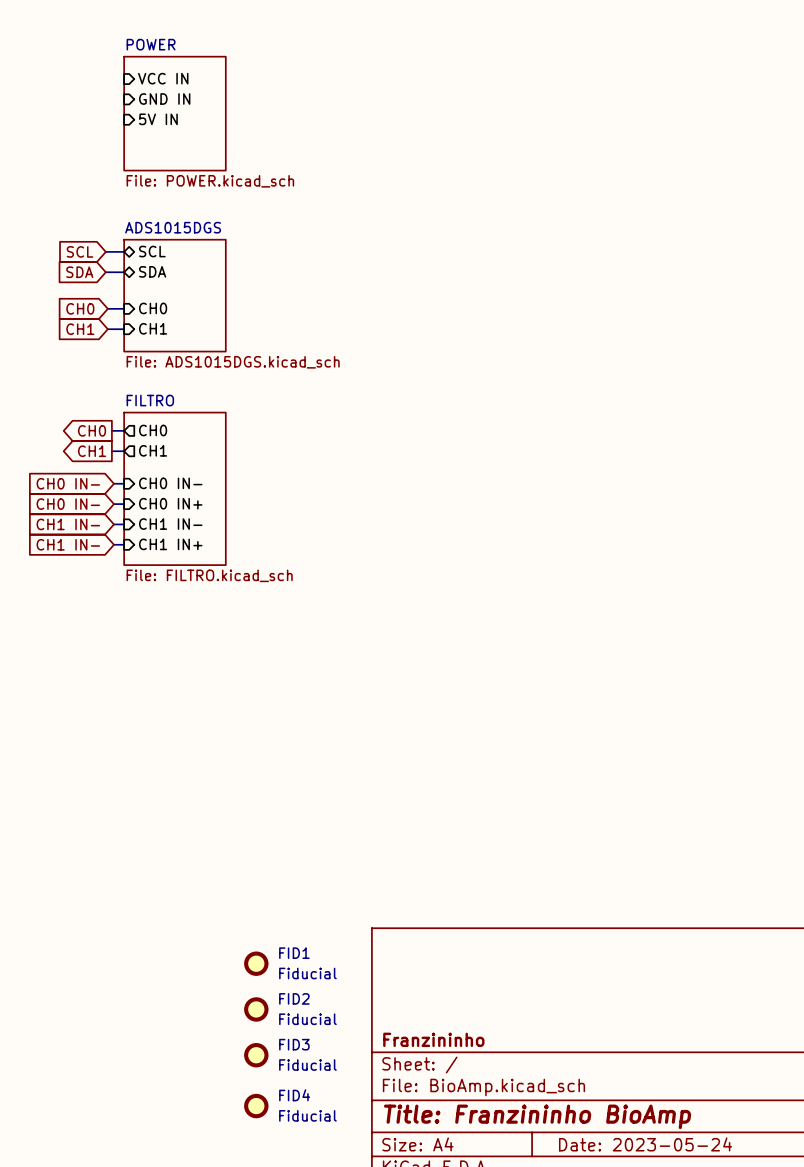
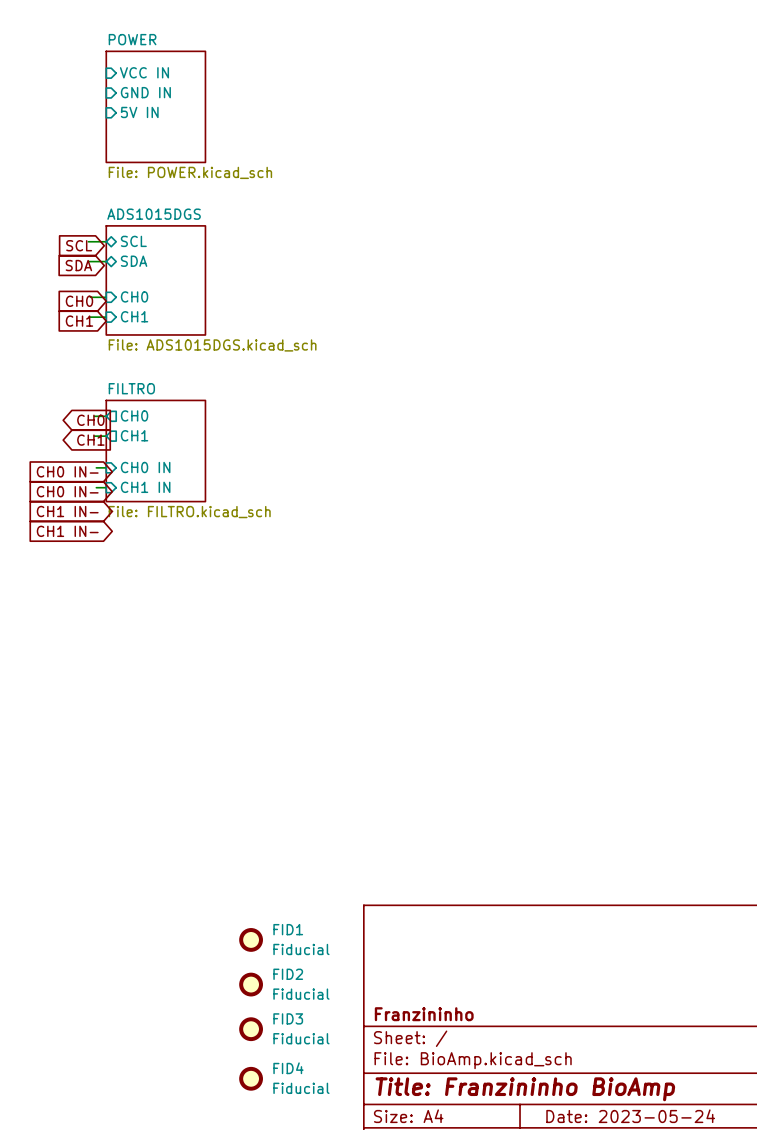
sheet pin position: VCC IN (163, 78) -> VCC IN (144, 72)
sheet pin position: GND IN (164, 99) -> GND IN (145, 92)
sheet POWER position: (174, 113) -> (155, 106)
sheet pin position: 5V IN (158, 119) -> 5V IN (139, 112)
wire: (105, 251) (124, 251) -> (88, 241) (106, 241)
sheet pin position: SCL (152, 251) -> SCL (133, 241)
sheet pin position: SDA (152, 271) -> SDA (134, 261)
wire: (105, 272) (124, 272) -> (88, 261) (106, 261)
sheet ADS1015DGS position: (174, 295) -> (155, 280)
wire: (107, 308) (124, 308) -> (90, 297) (106, 297)
sheet pin position: CH0 (153, 308) -> CH0 (134, 296)
sheet pin position: CH1 (153, 328) -> CH1 (134, 316)
wire: (107, 329) (124, 329) -> (90, 317) (106, 317)
wire: (111, 430) (124, 430) -> (94, 416) (106, 416)
sheet pin position: CH0 (153, 430) -> CH0 (134, 415)
sheet pin position: CH1 (153, 450) -> CH1 (134, 435)
wire: (111, 451) (124, 451) -> (94, 436) (106, 436)
sheet FILTRO: none -> File: FILTRO.kicad_sch (155, 451)
sheet pin: none -> CH0 IN (145, 467)
wire: (113, 483) (124, 483) -> (96, 467) (106, 467)
sheet pin: CH0 IN- (170, 483) -> none
sheet FILTRO: File: FILTRO.kicad_sch (174, 488) -> none
sheet pin: none -> CH1 IN (145, 487)
sheet pin: CH0 IN+ (170, 503) -> none
wire: (113, 504) (124, 504) -> (96, 487) (106, 487)
wire: (113, 524) (124, 524) -> none
sheet pin: CH1 IN- (170, 524) -> none
wire: (113, 544) (124, 544) -> none
sheet pin: CH1 IN+ (170, 544) -> none

